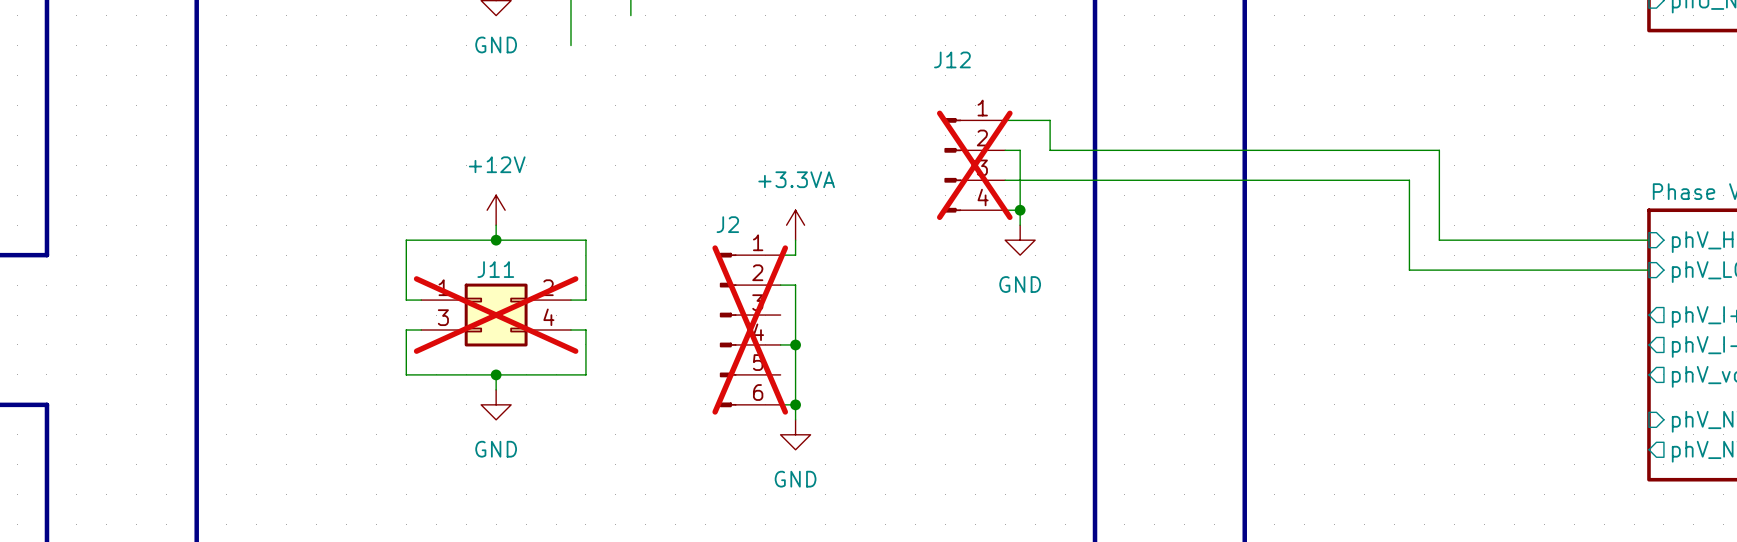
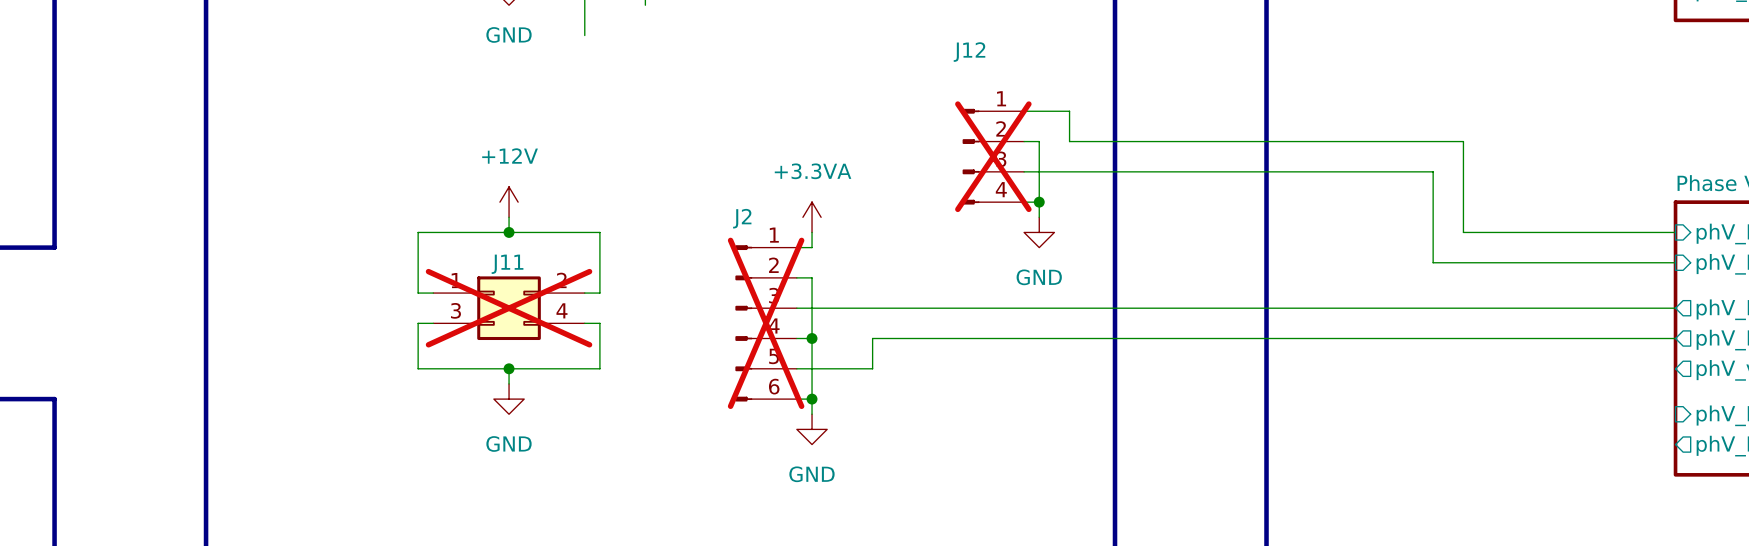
wire: none -> (796, 308) (1675, 308)
wire: none -> (1675, 338) (872, 338) (872, 368) (796, 368)

